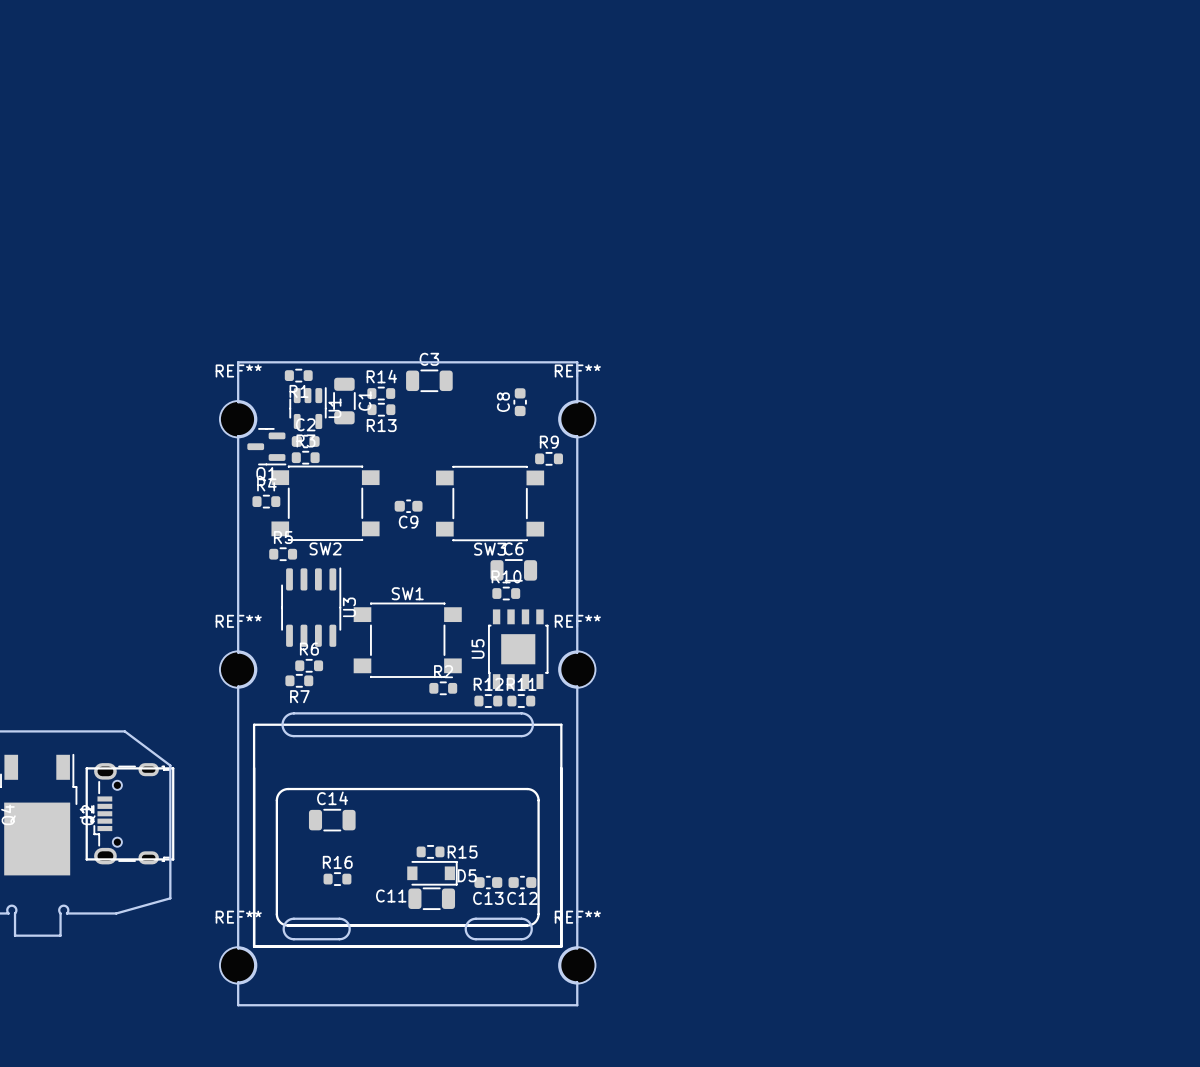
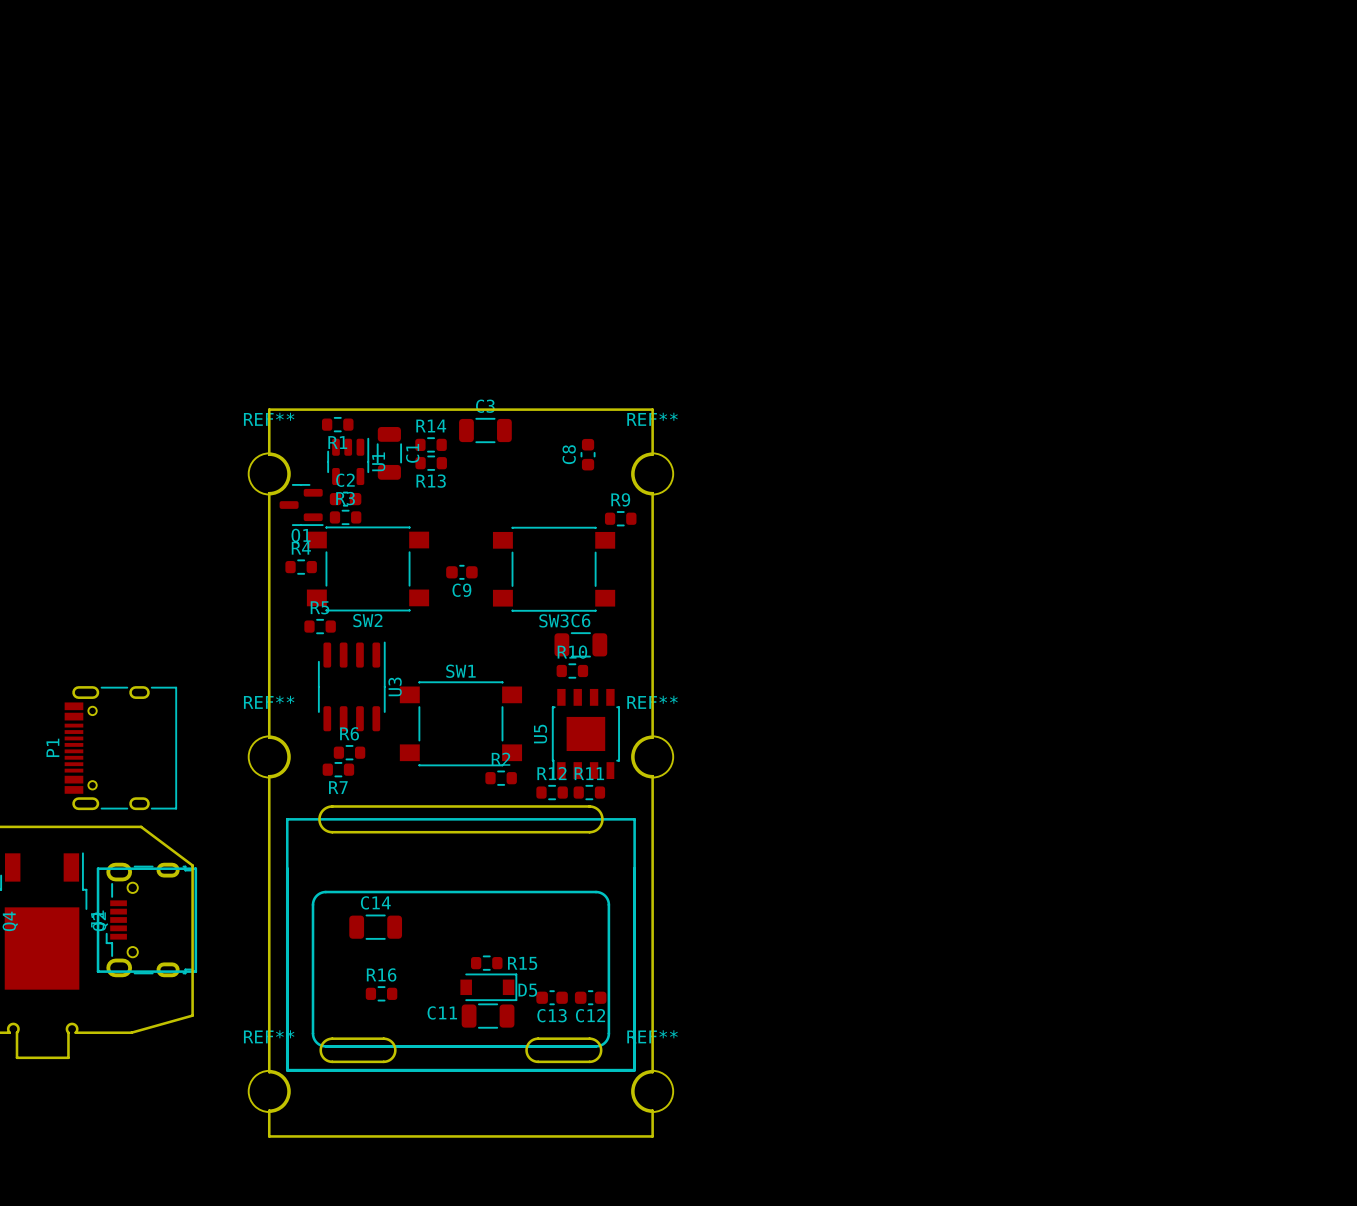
P1: none -> (120, 748)

